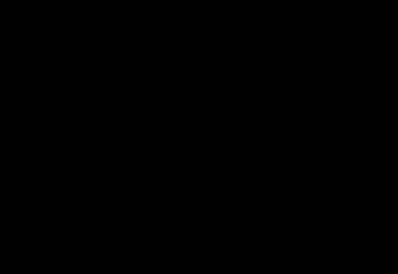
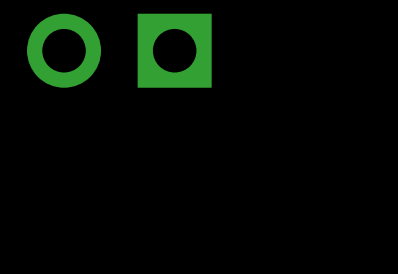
part: none -> (119, 50)

